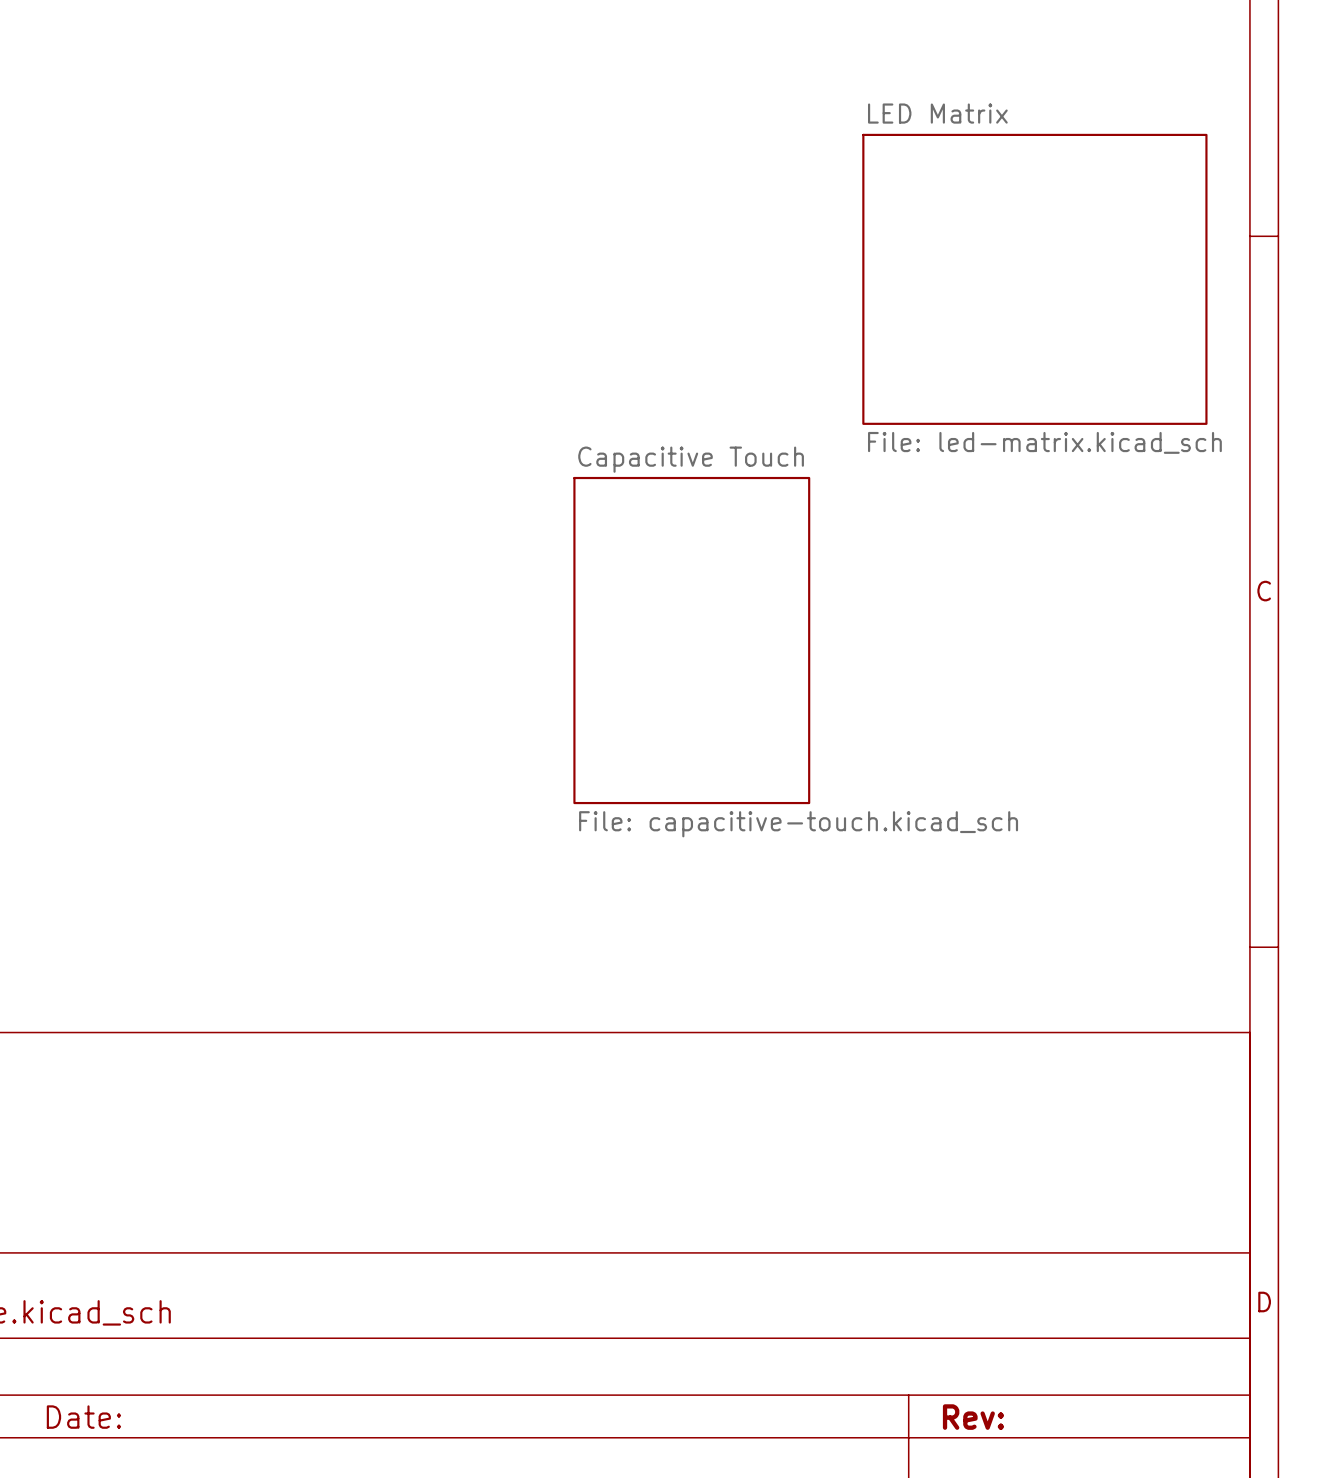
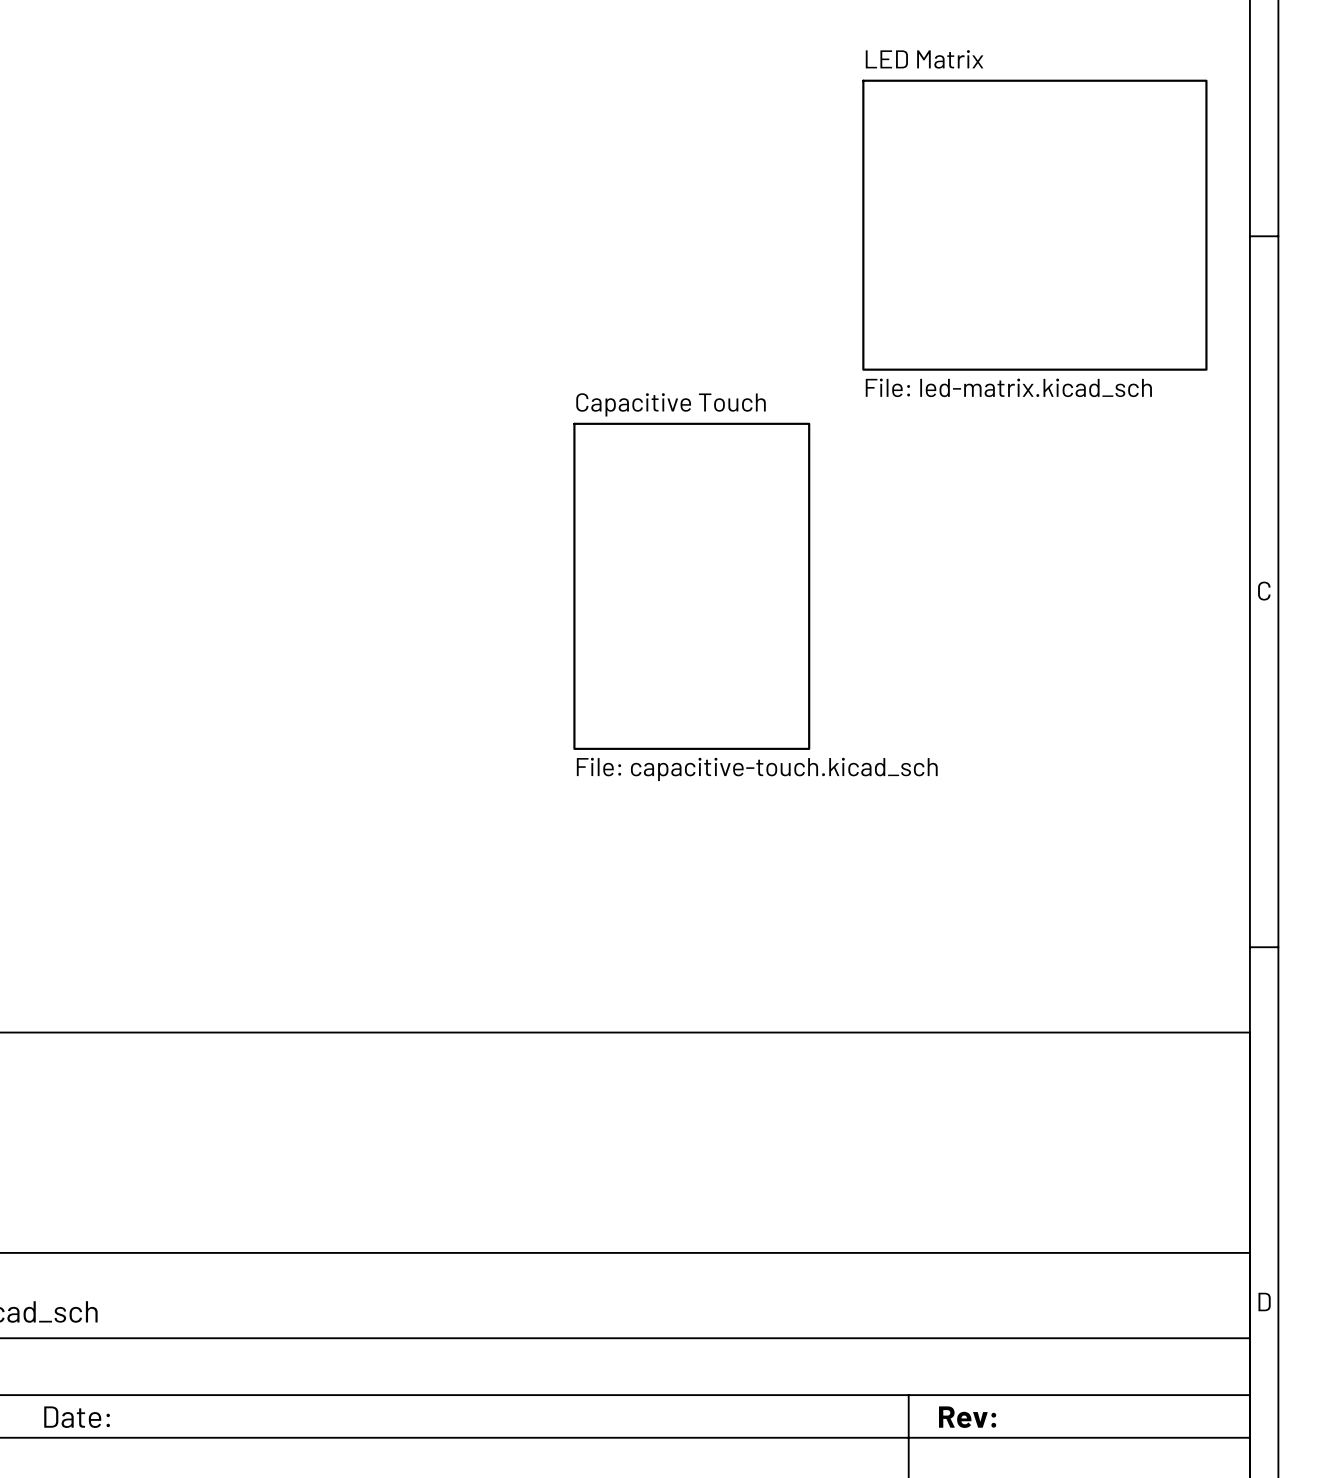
sheet LED Matrix position: (1034, 279) -> (1034, 225)
sheet Capacitive Touch position: (691, 640) -> (691, 586)

